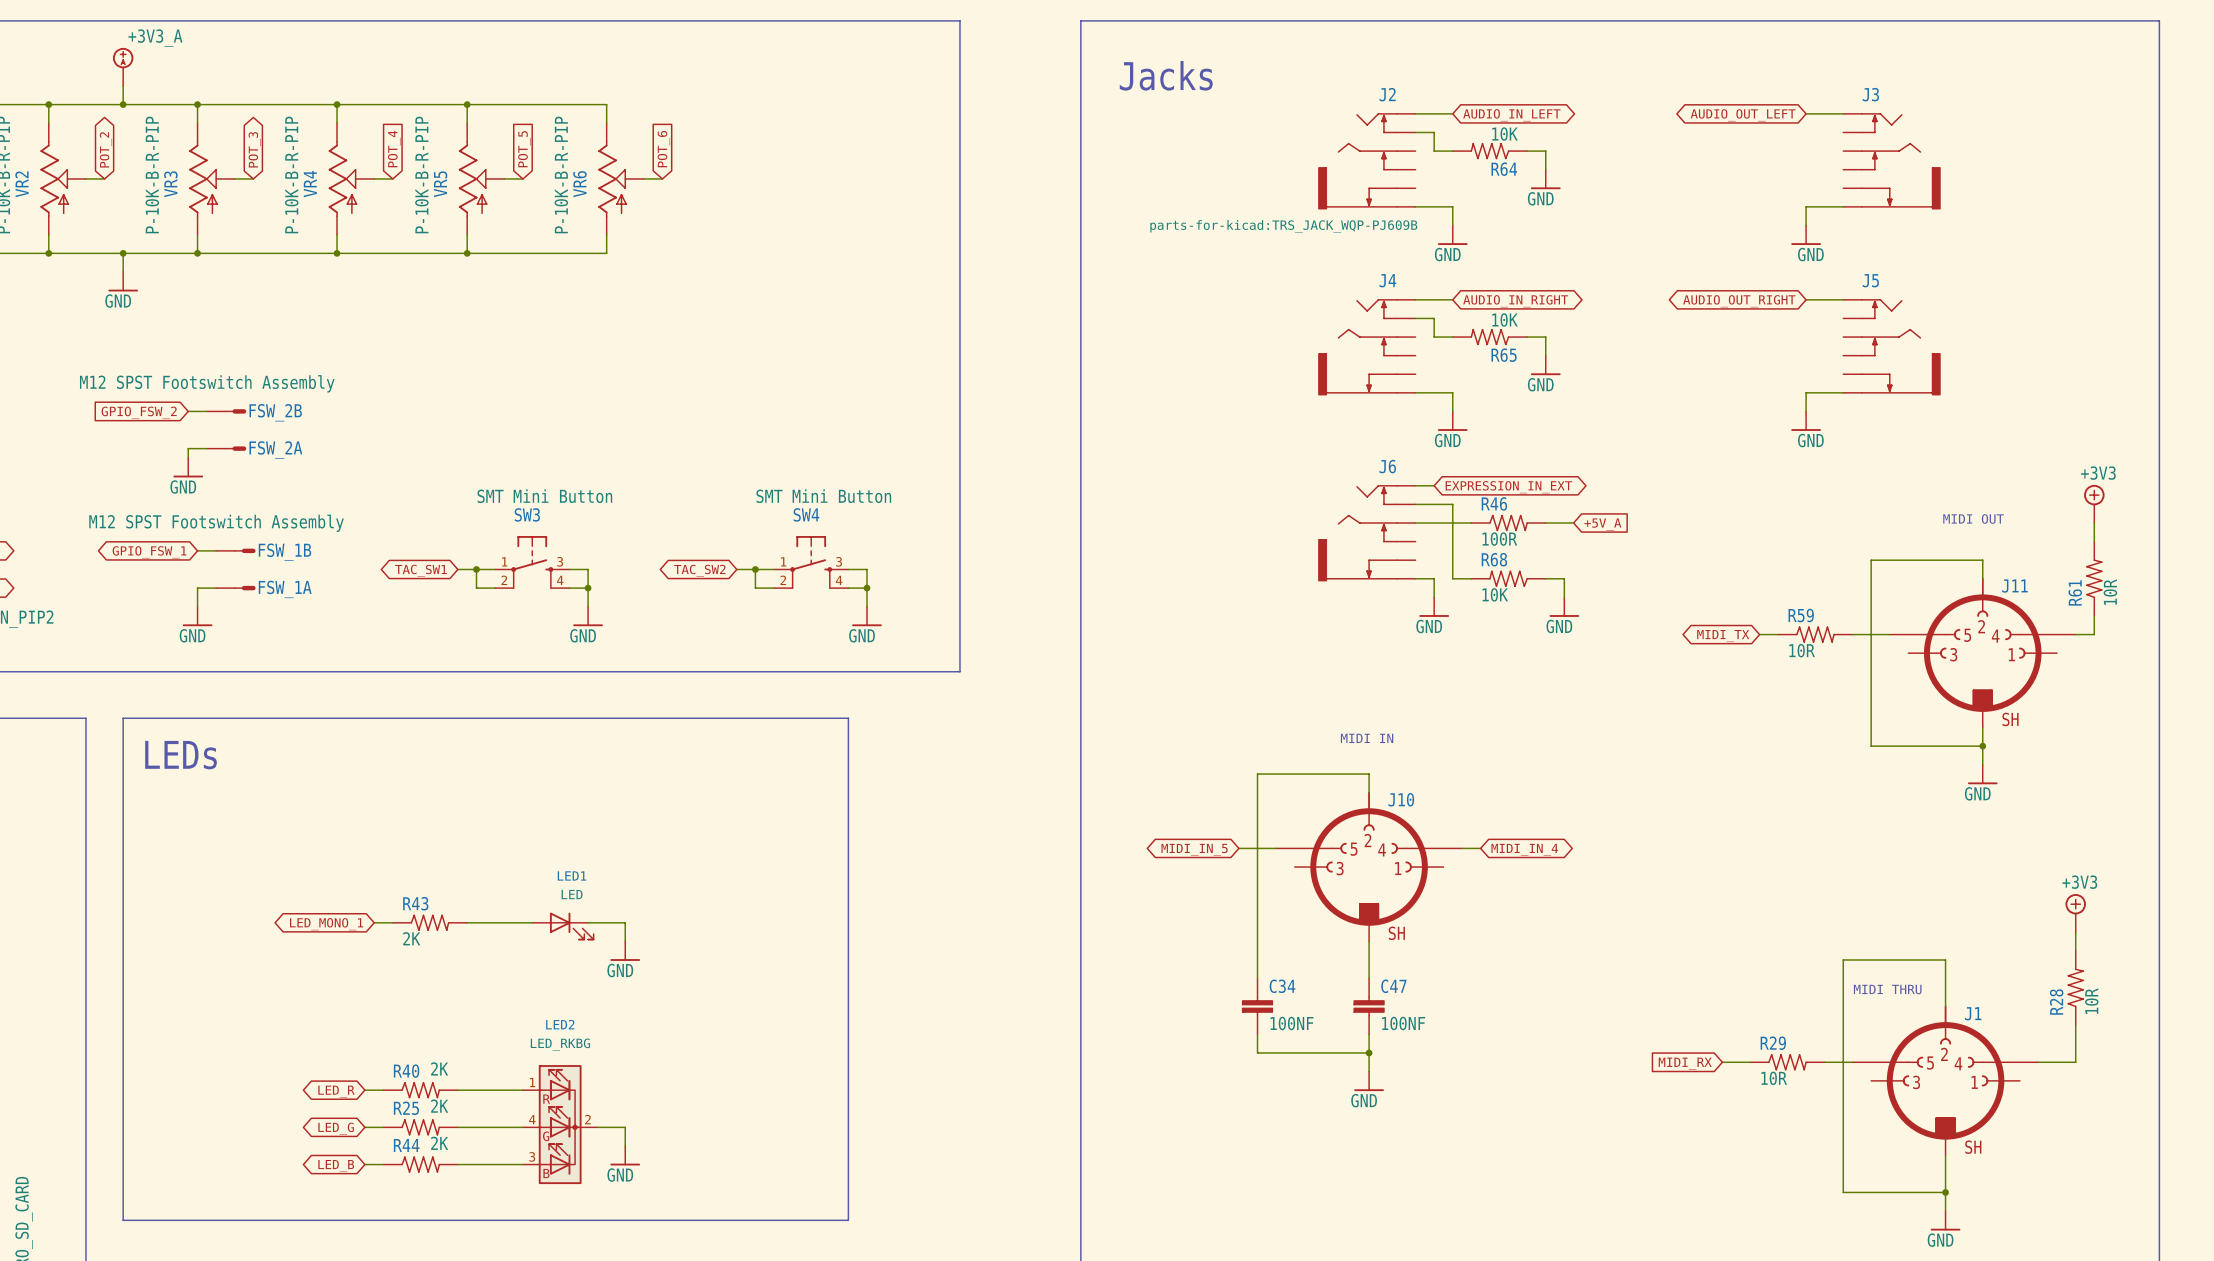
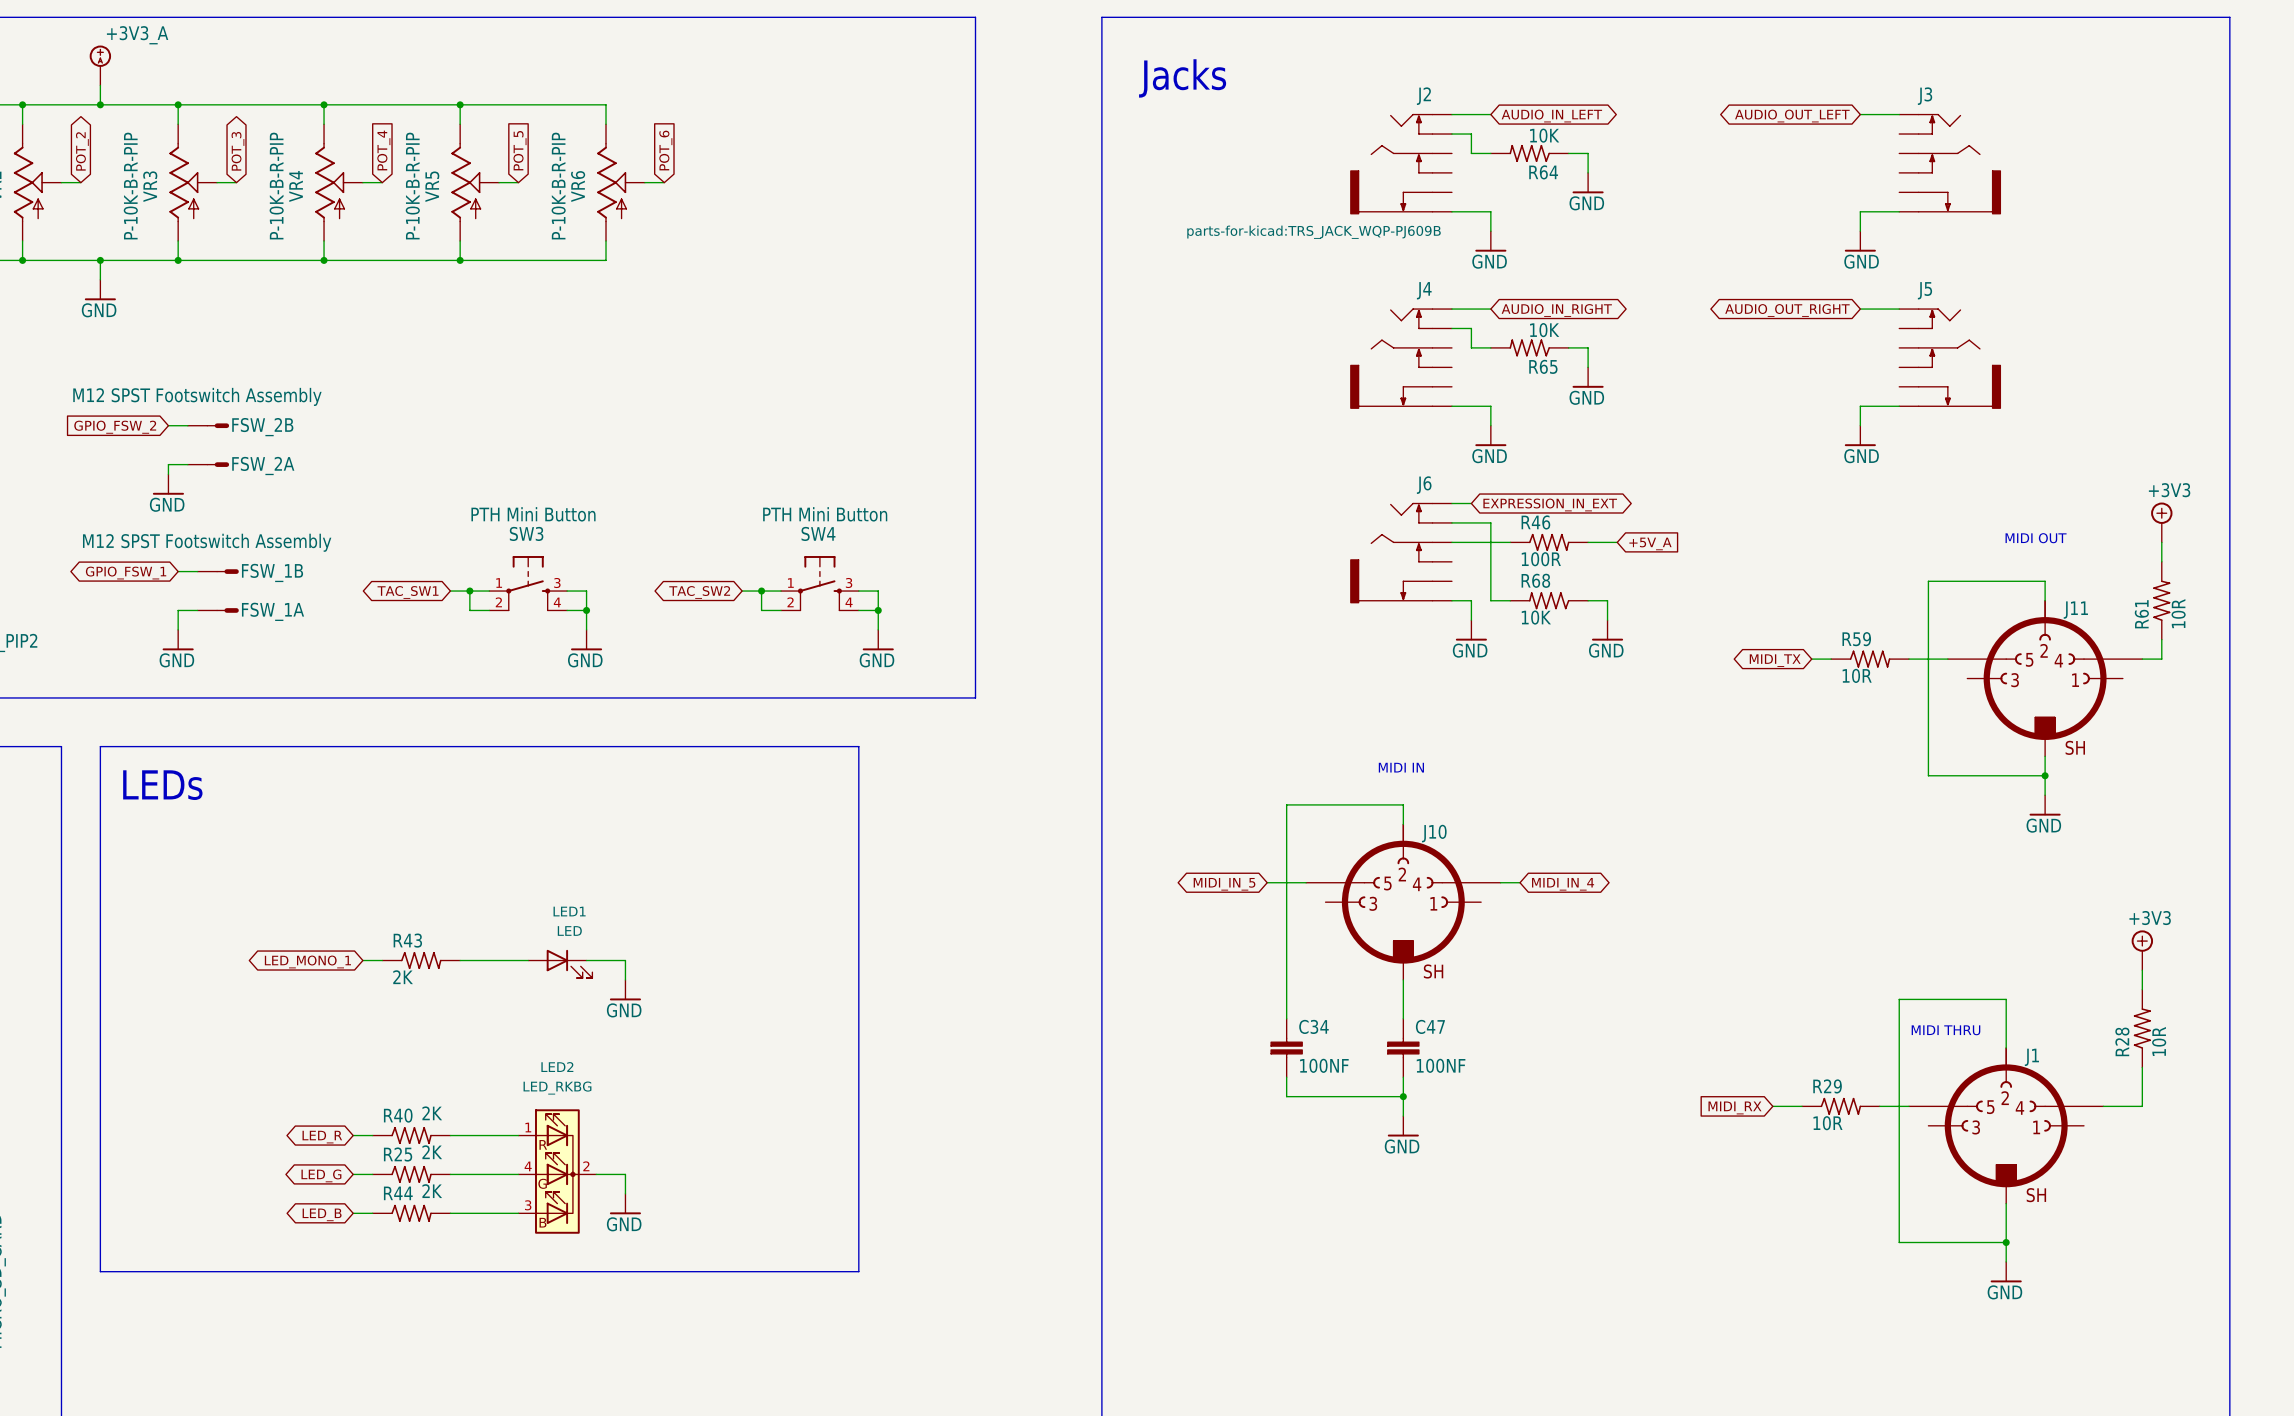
SW3 value: SMT Mini Button (544, 496) -> PTH Mini Button (533, 514)
SW4 value: SMT Mini Button (823, 496) -> PTH Mini Button (825, 514)

